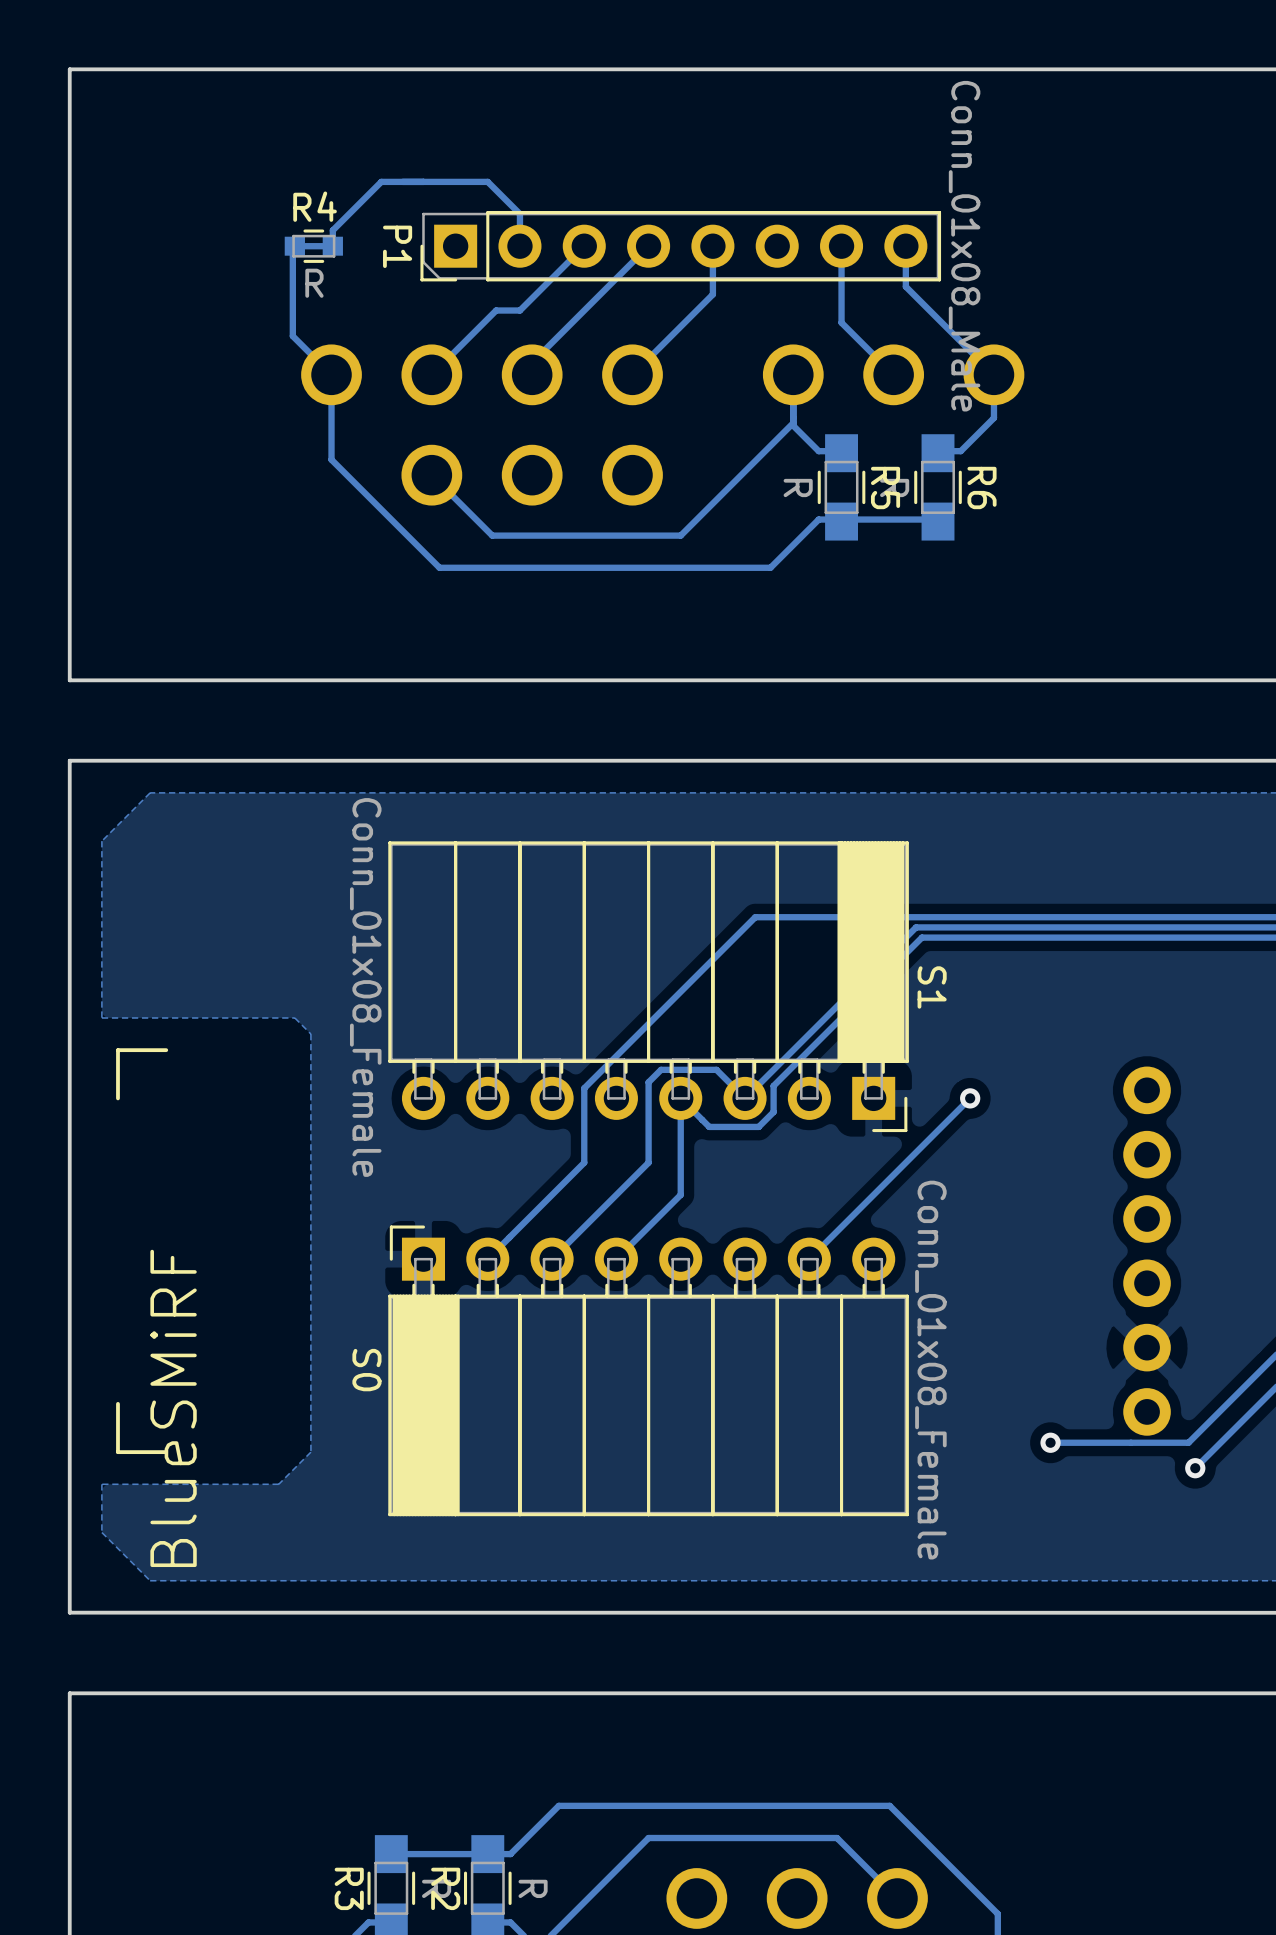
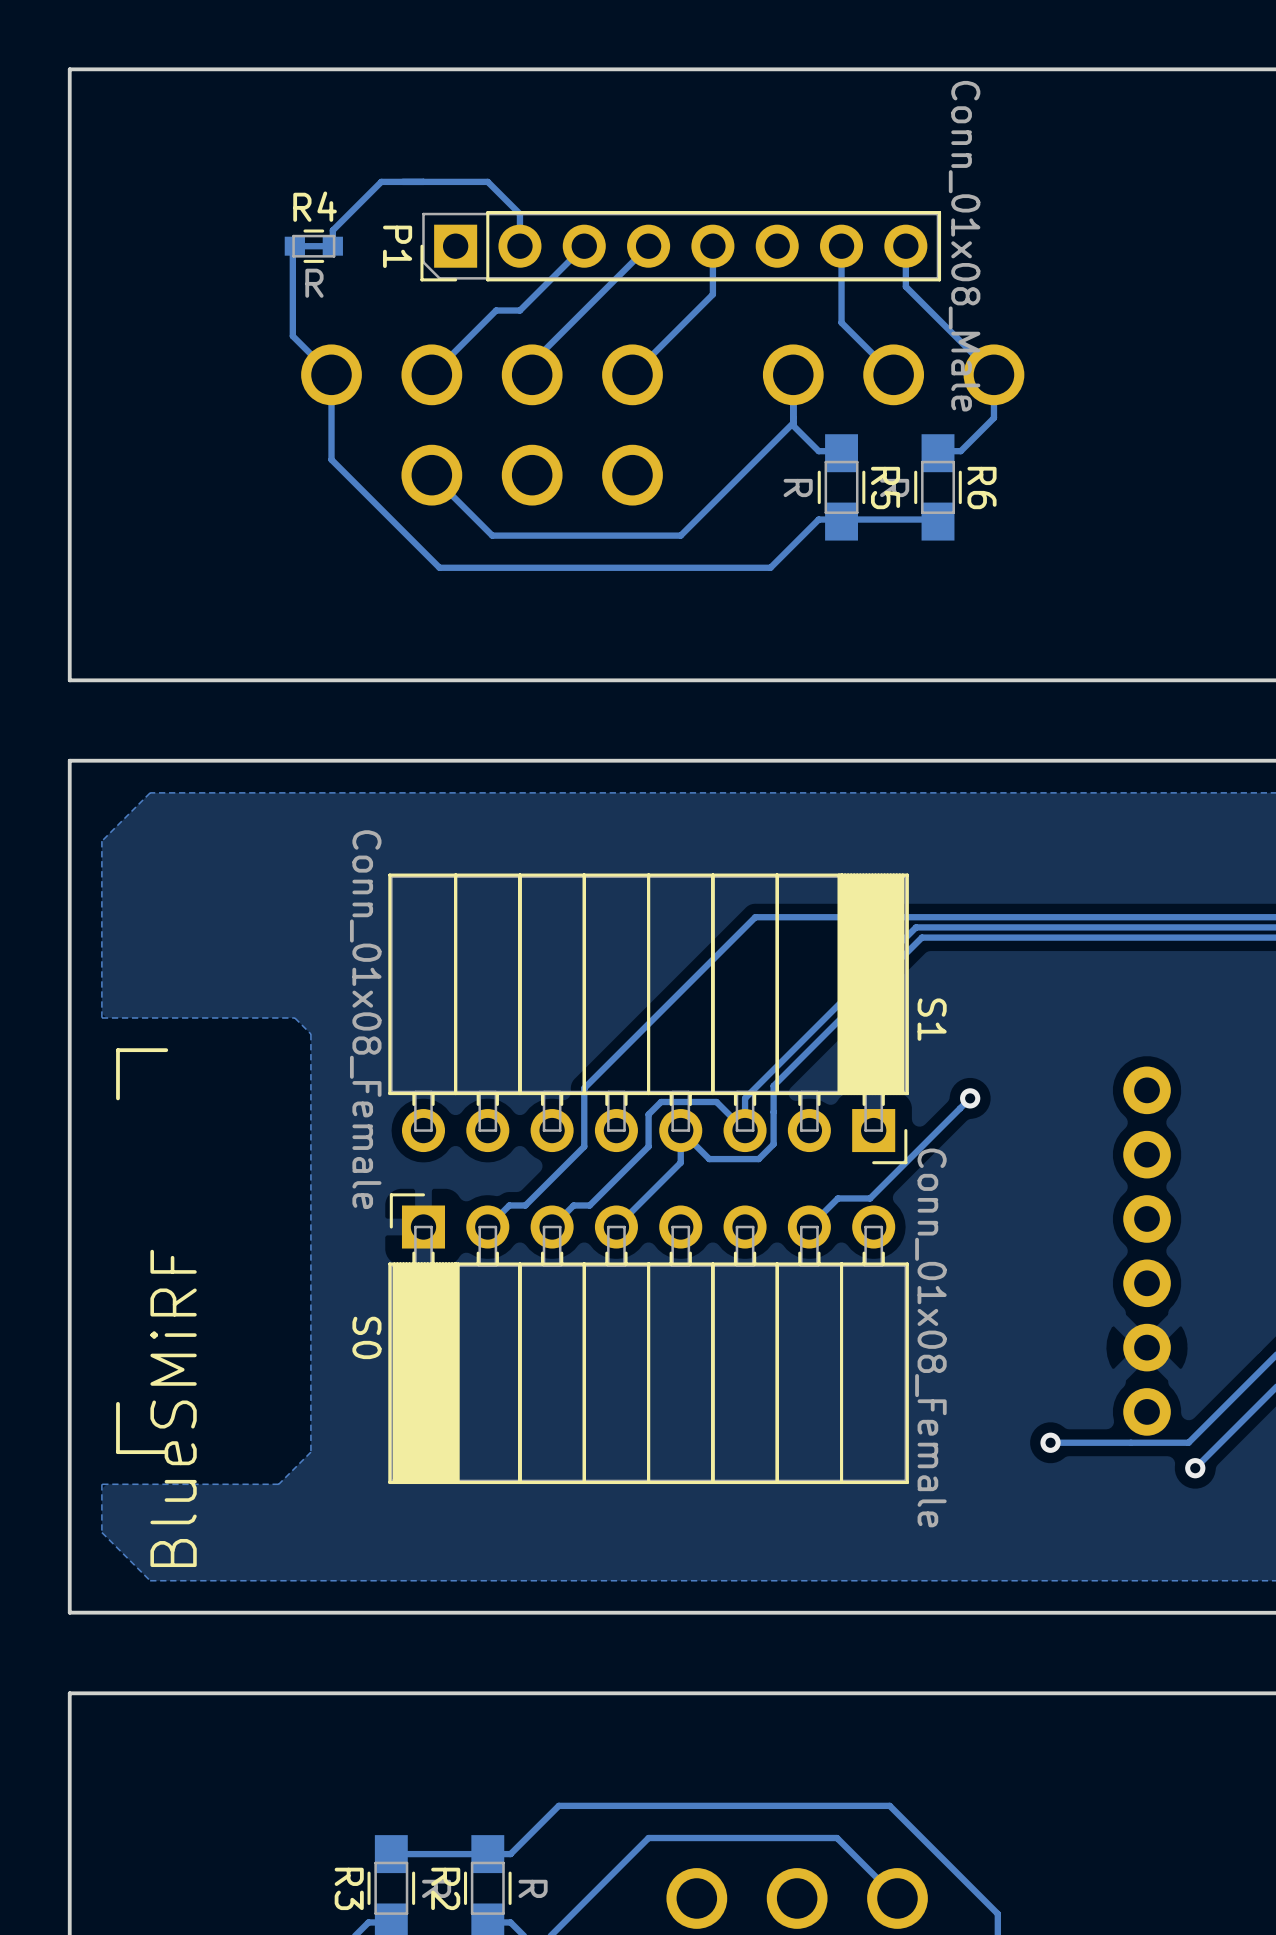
S1 position: (648, 986) -> (648, 1018)
track: (745, 1098) (716, 1069) (661, 1069) (648, 1082) (648, 1114) -> (745, 1098) (745, 1130) (716, 1102) (661, 1102) (648, 1114)
track: (773, 1112) (758, 1126) (709, 1126) (680, 1098) (680, 1130) -> (773, 1112) (773, 1144) (758, 1159) (709, 1159) (680, 1130)
track: (584, 1146) (584, 1162) (487, 1259) -> (584, 1146) (525, 1205) (509, 1205) (487, 1227)
track: (648, 1146) (648, 1162) (552, 1259) -> (648, 1146) (589, 1205) (573, 1205) (552, 1227)
track: (680, 1162) (680, 1194) (616, 1259) -> (680, 1162) (616, 1227)
track: (870, 1198) (809, 1259) -> (870, 1198) (837, 1198) (809, 1227)
S0 position: (648, 1370) -> (648, 1338)

